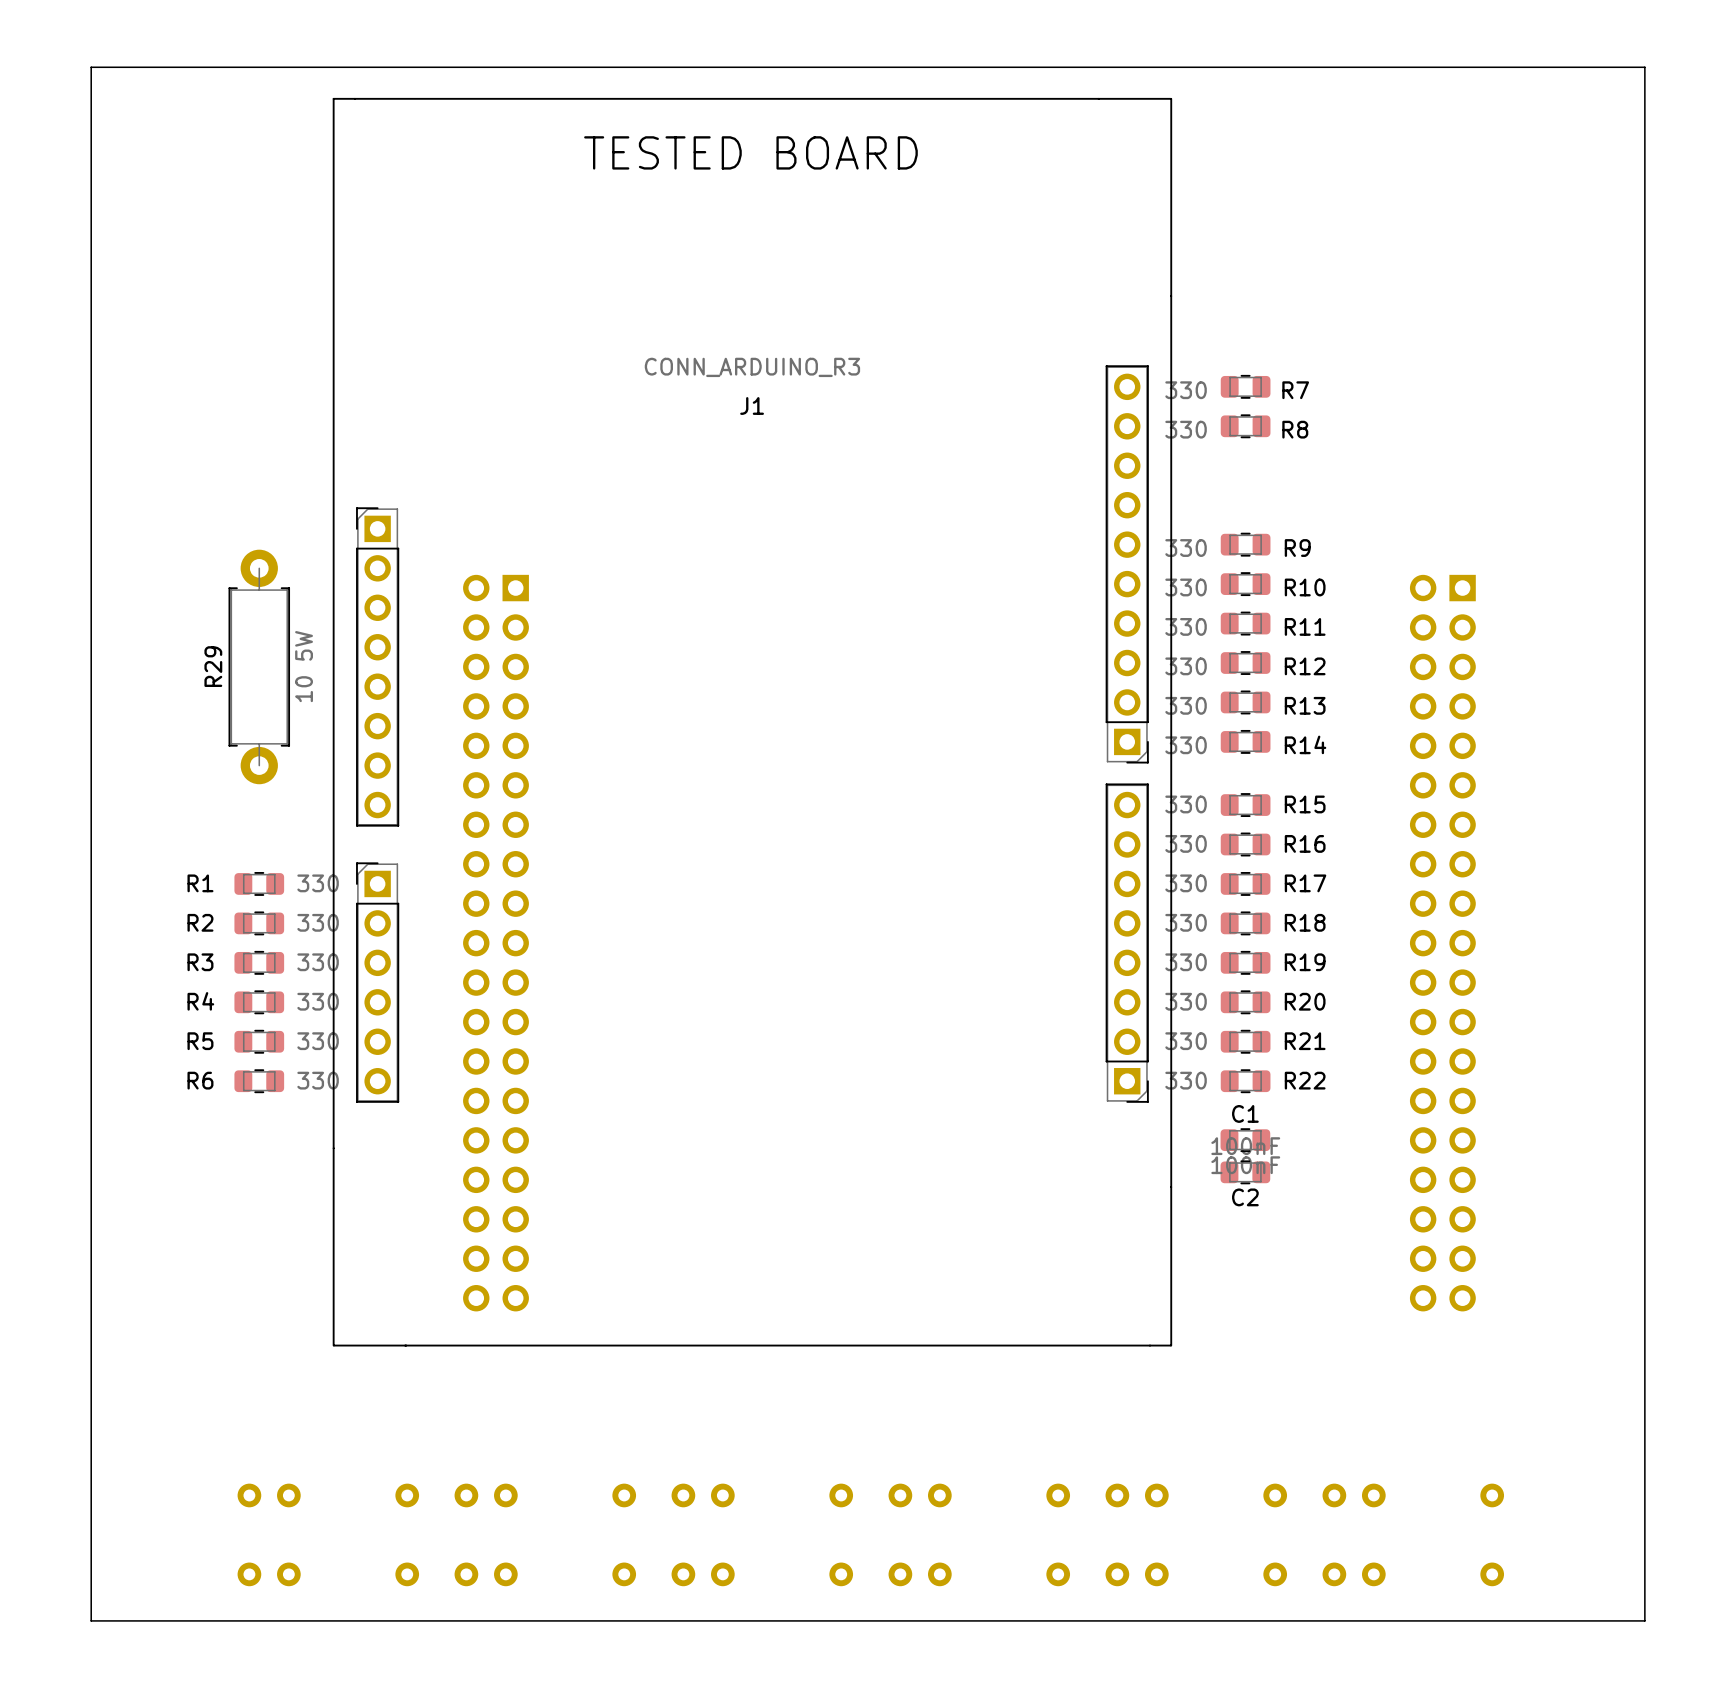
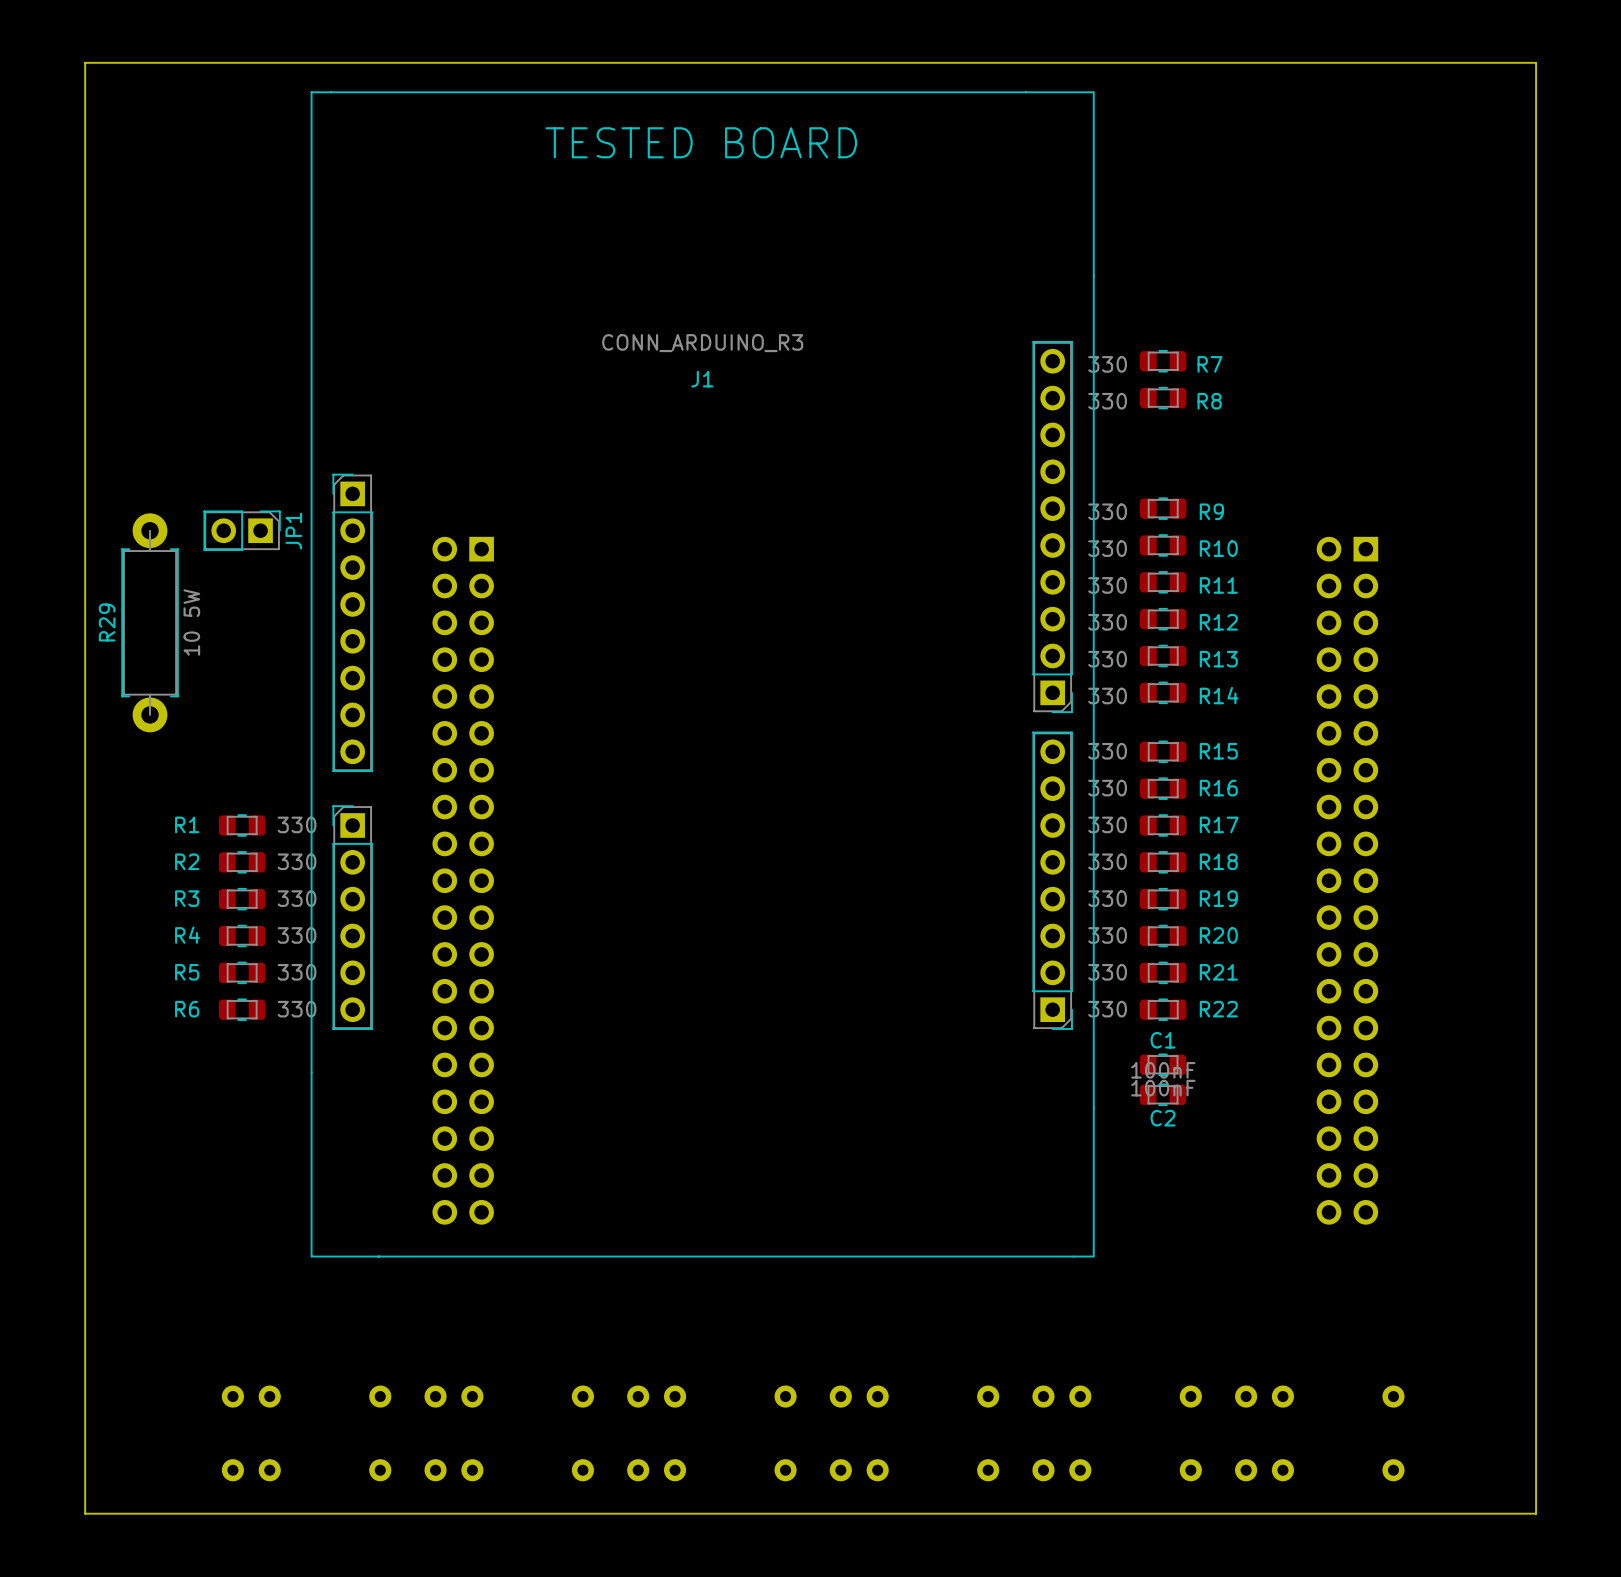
JP1: none -> (242, 530)
R29 position: (259, 666) -> (150, 622)

